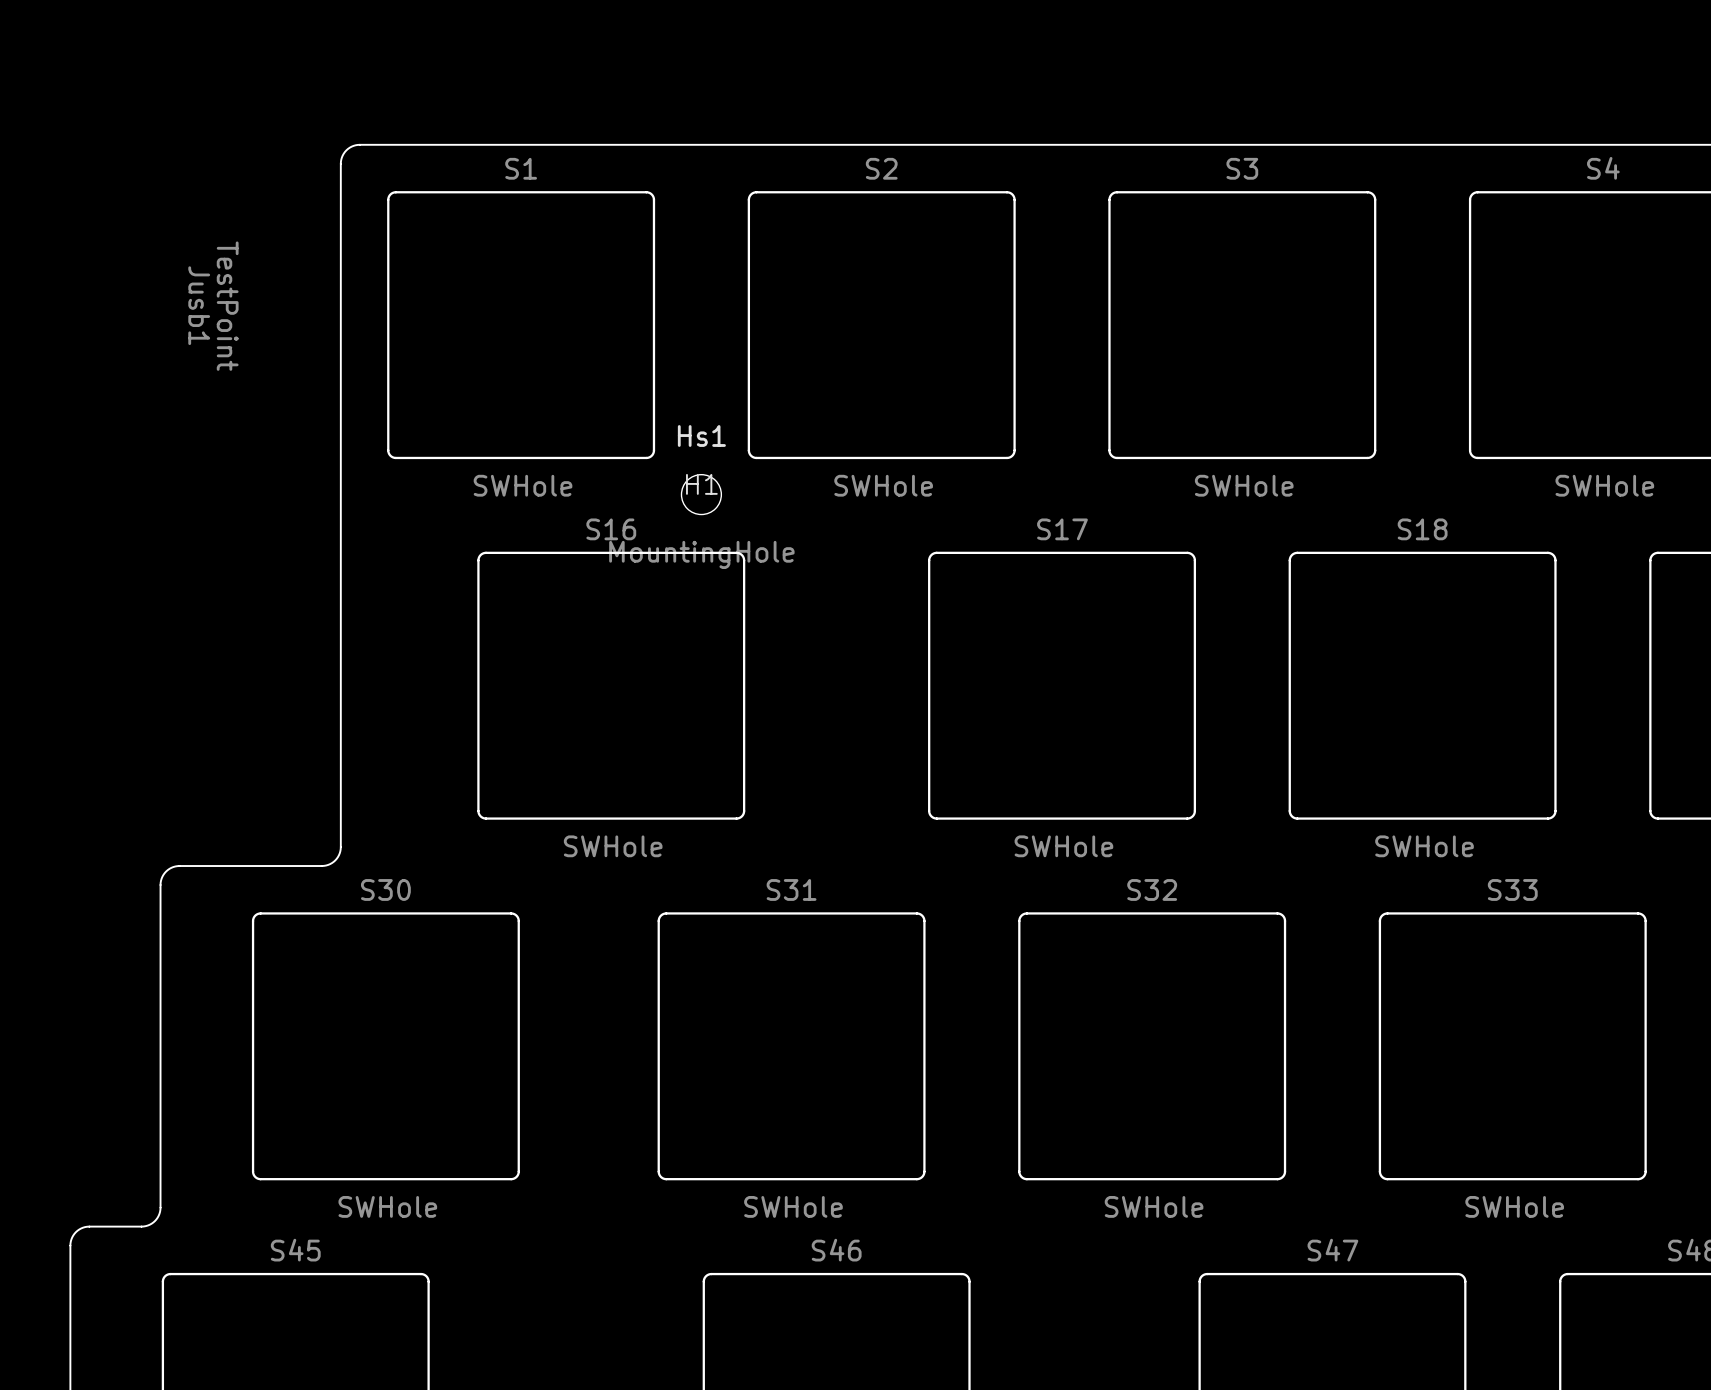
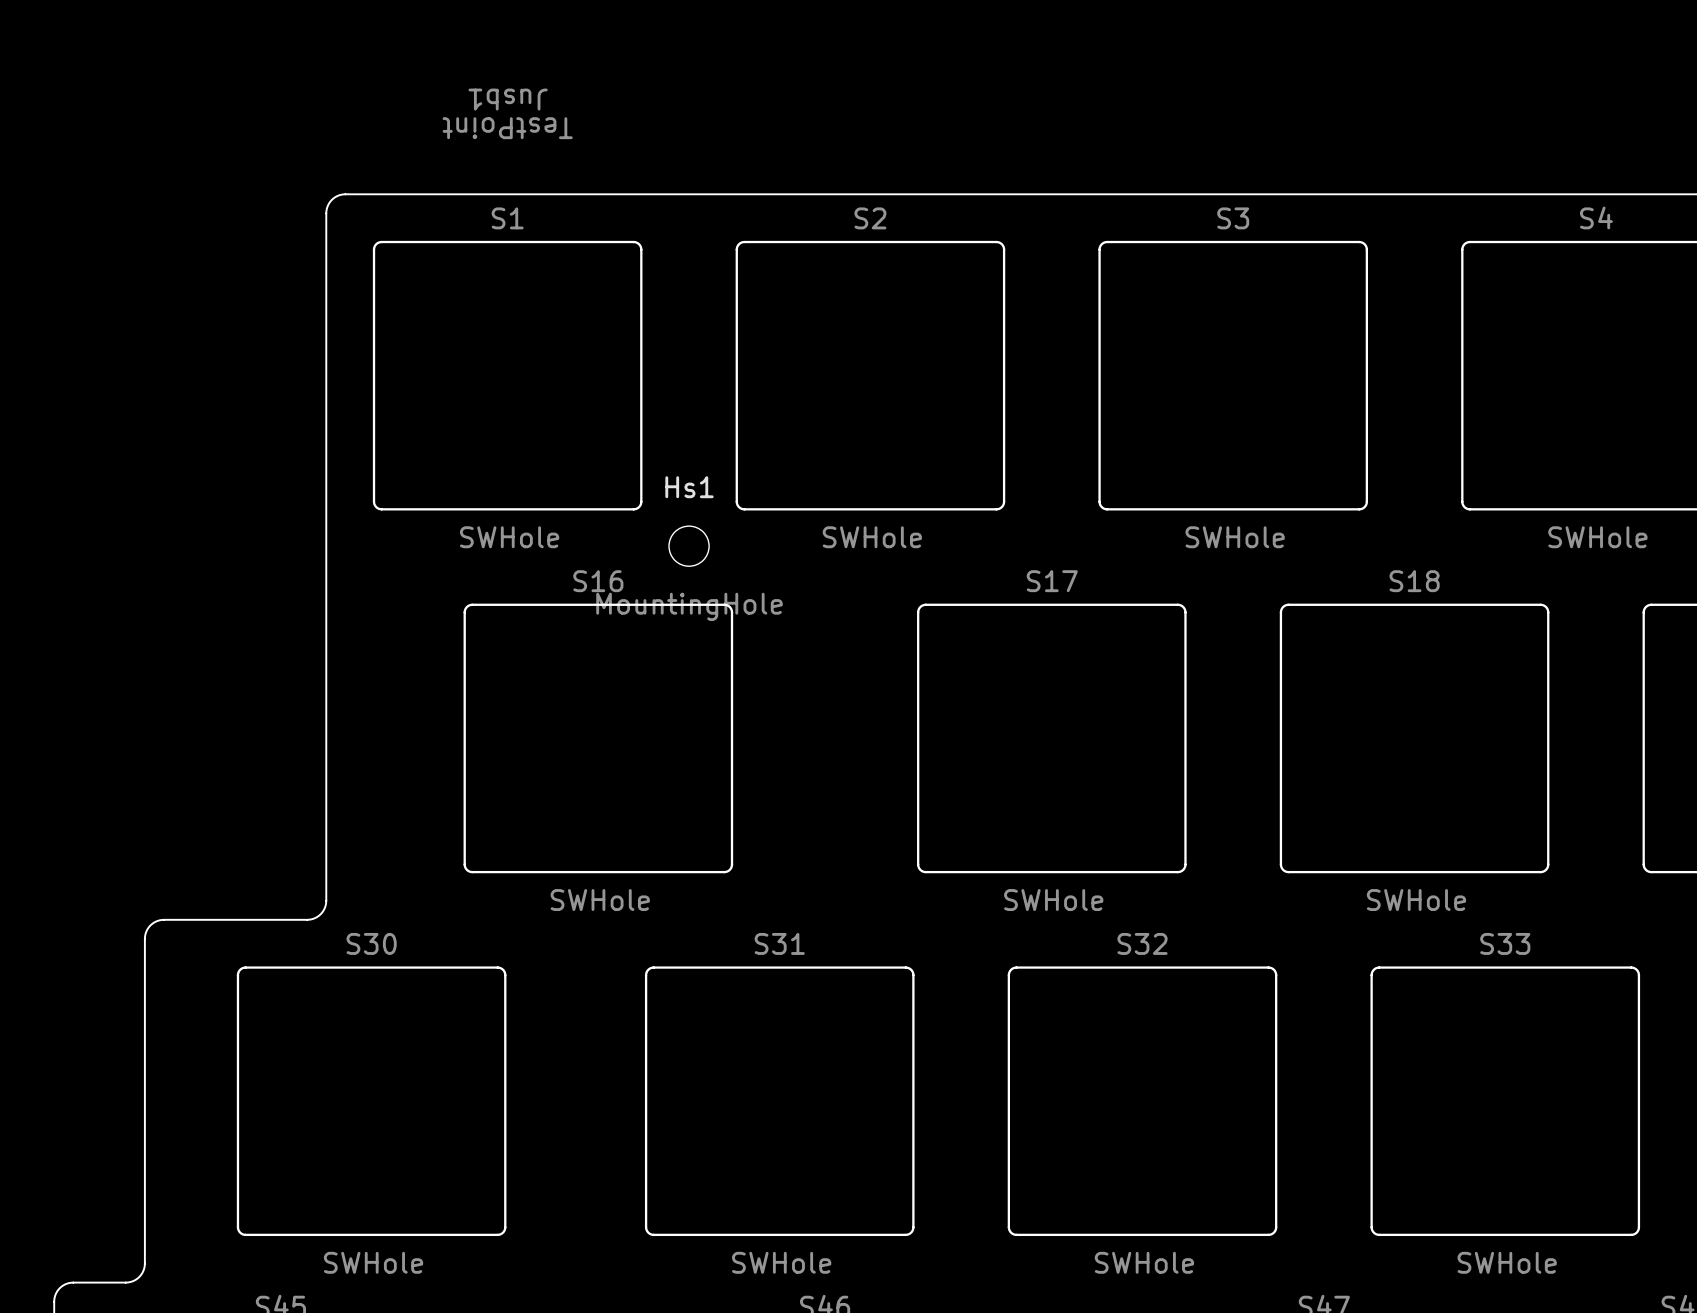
Jusb1 name rotation: 0° (199, 305) -> 90° clockwise (508, 99)
Jusb1 position: (213, 306) -> (507, 113)
Jusb1 value rotation: 0° (227, 306) -> 90° clockwise (507, 128)
H1: (701, 484) -> none

